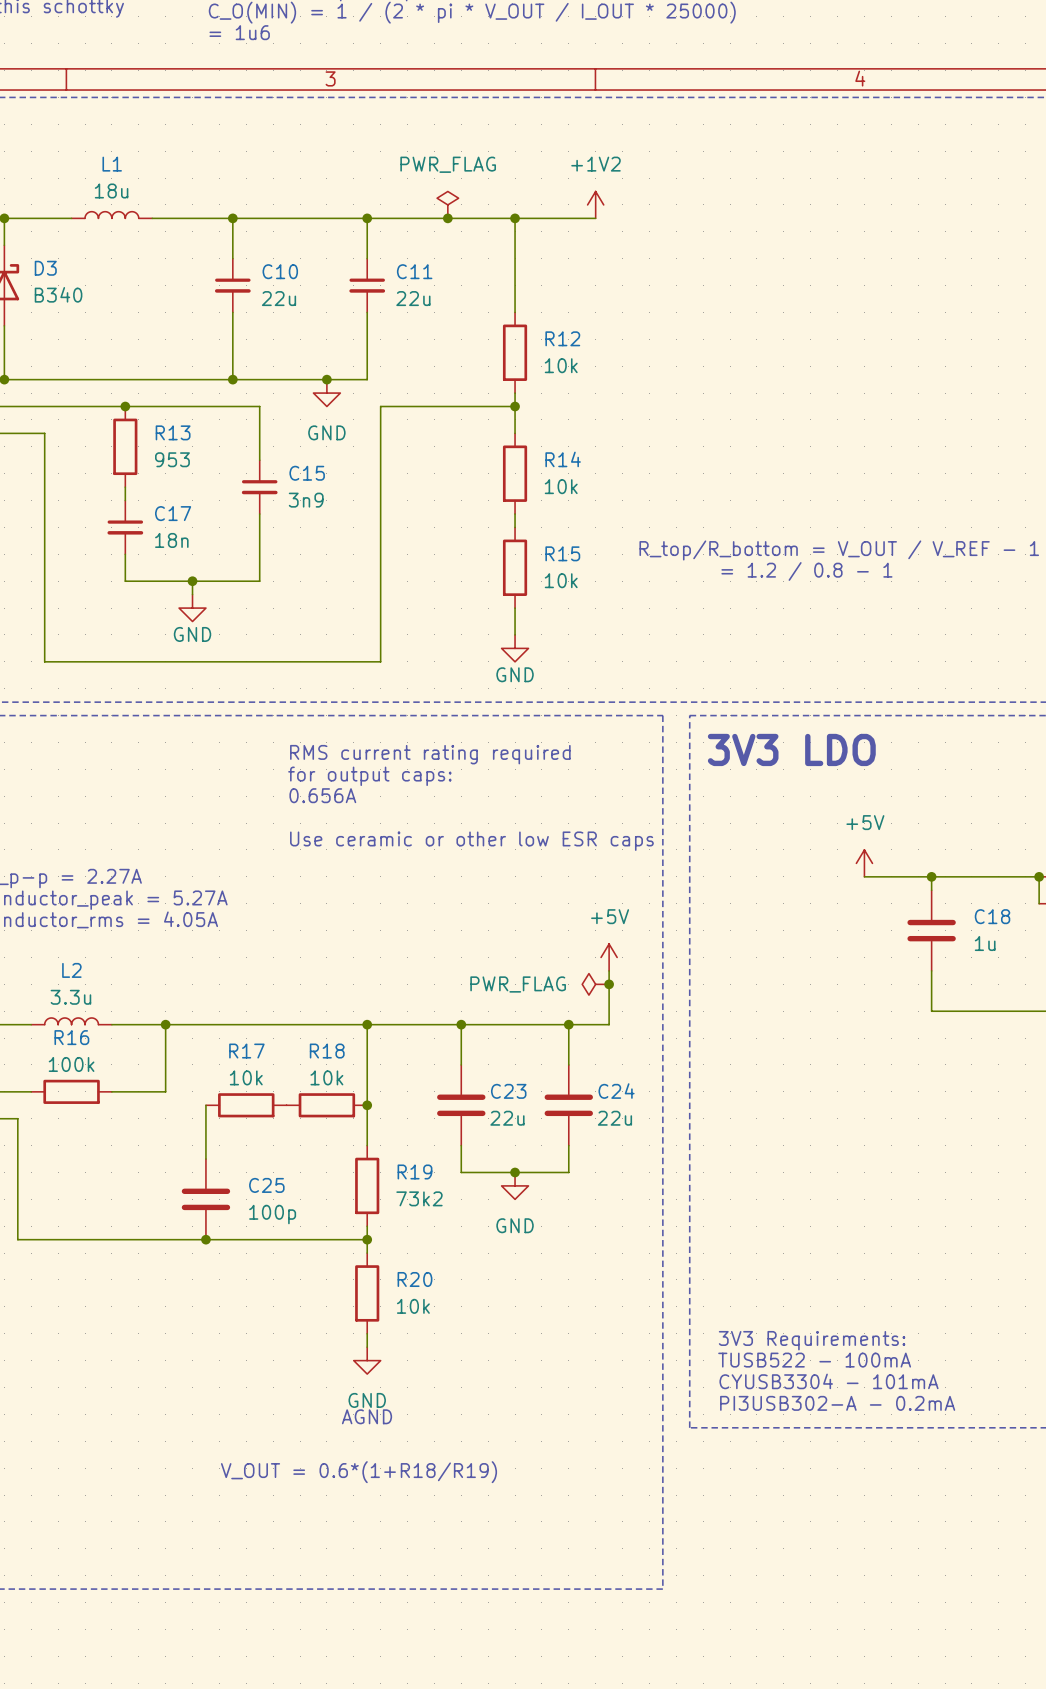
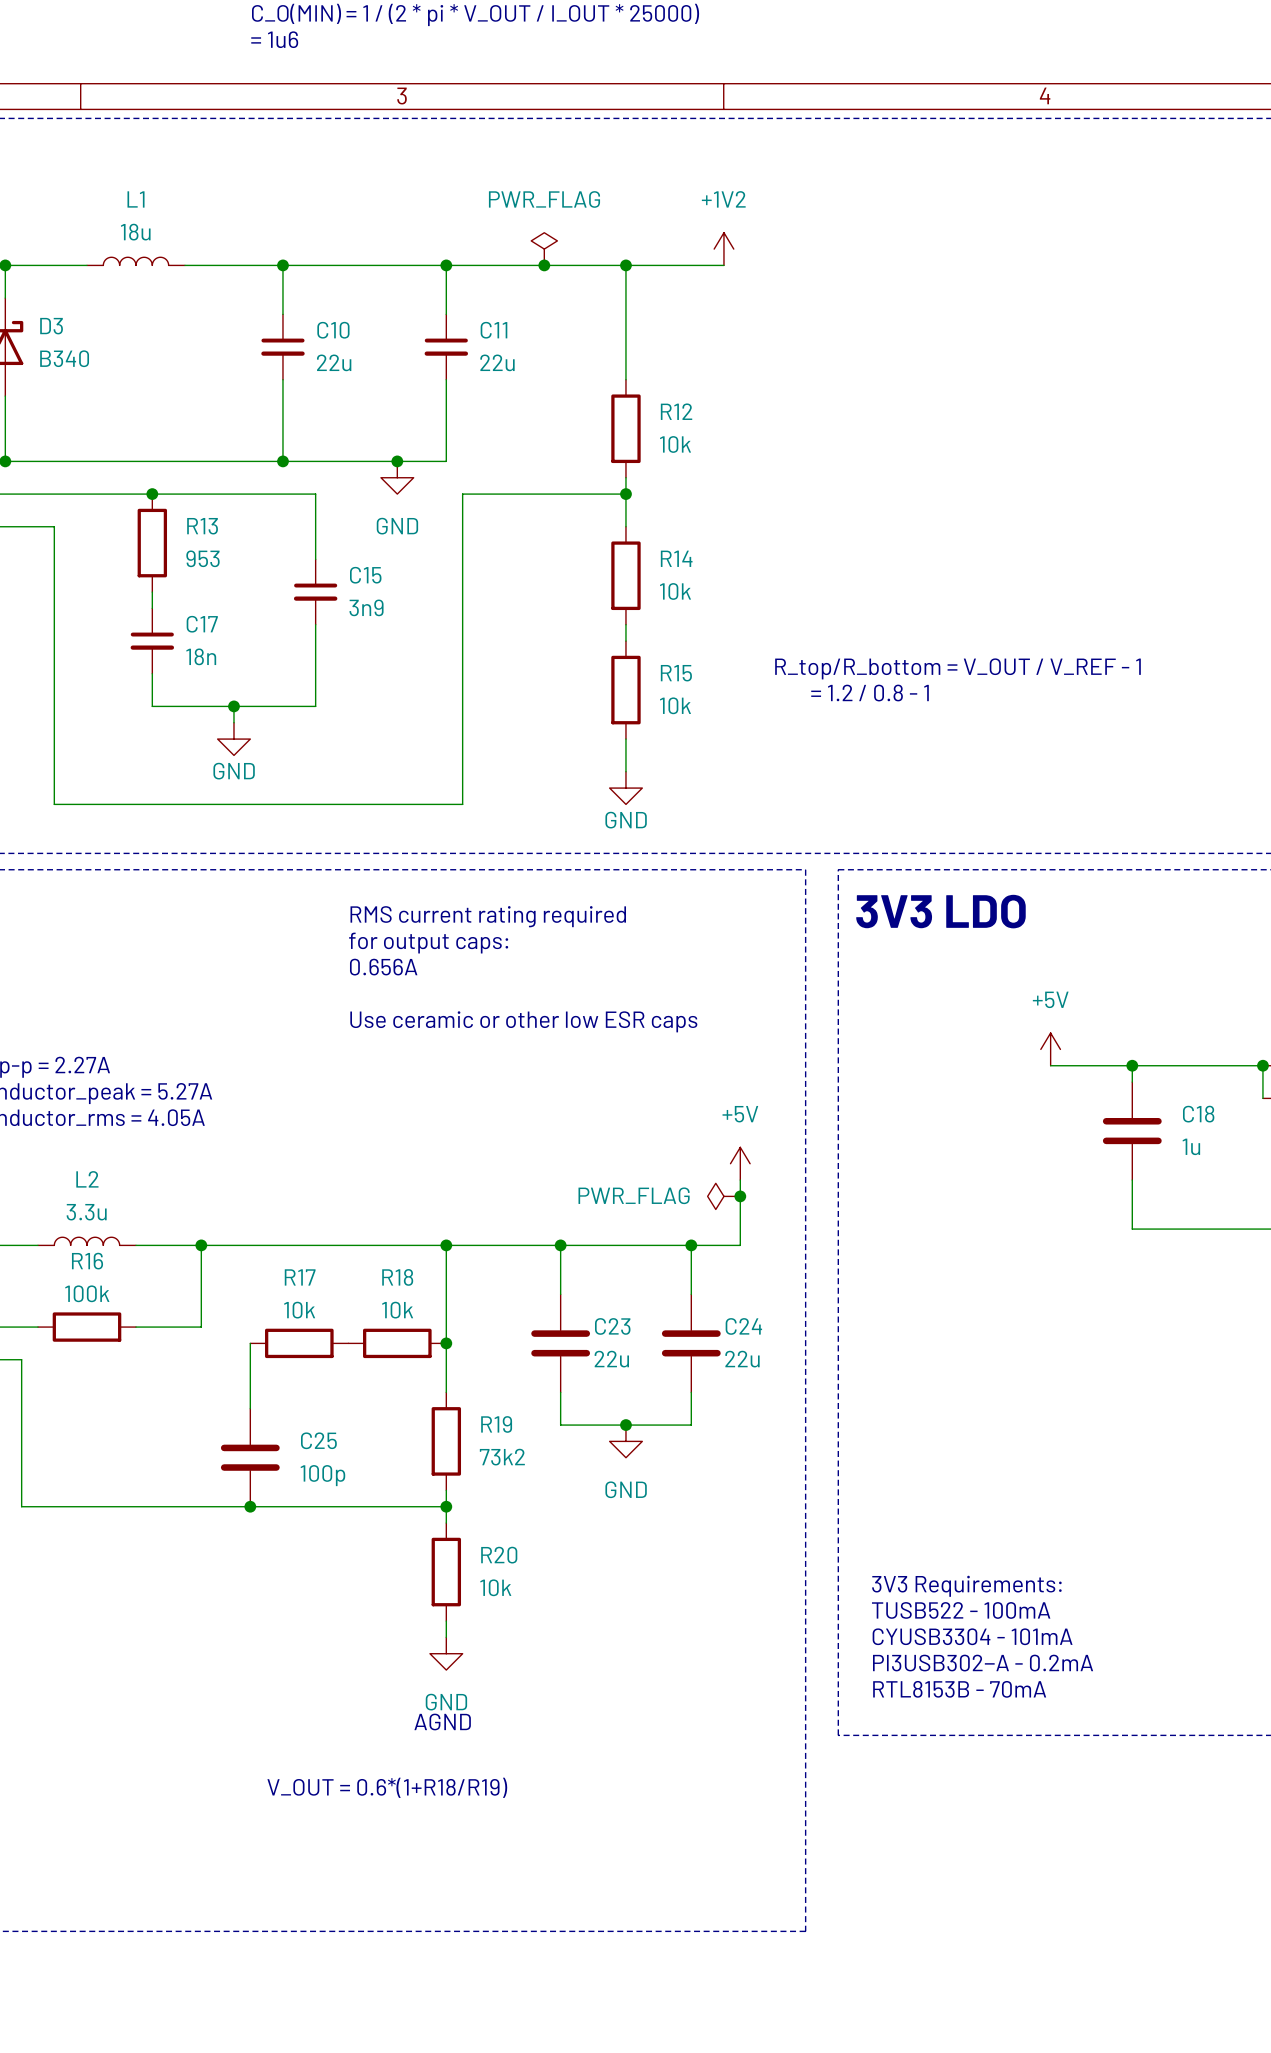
text position: 3V3 Requirements: (812, 1340) -> 3V3 Requirements: (966, 1586)
text position: TUSB522 - 100mA (814, 1360) -> TUSB522 - 100mA (961, 1610)
text position: CYUSB3304 - 101mA (829, 1381) -> CYUSB3304 - 101mA (972, 1636)
text: none -> RTL8153B - 70mA (959, 1689)
text position: PI3USB302−A - 0.2mA (837, 1403) -> PI3USB302−A - 0.2mA (983, 1663)

